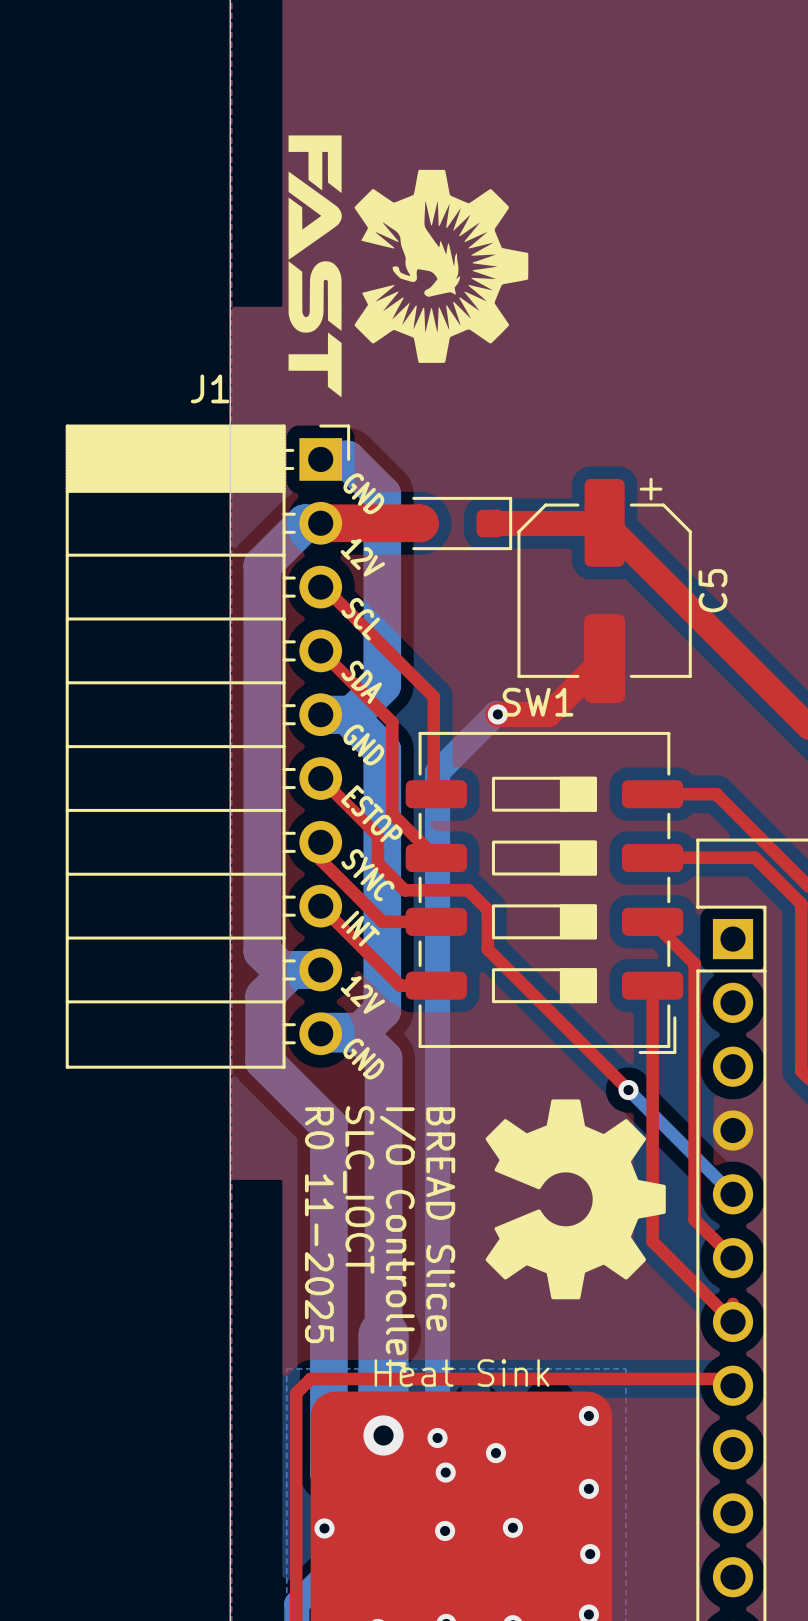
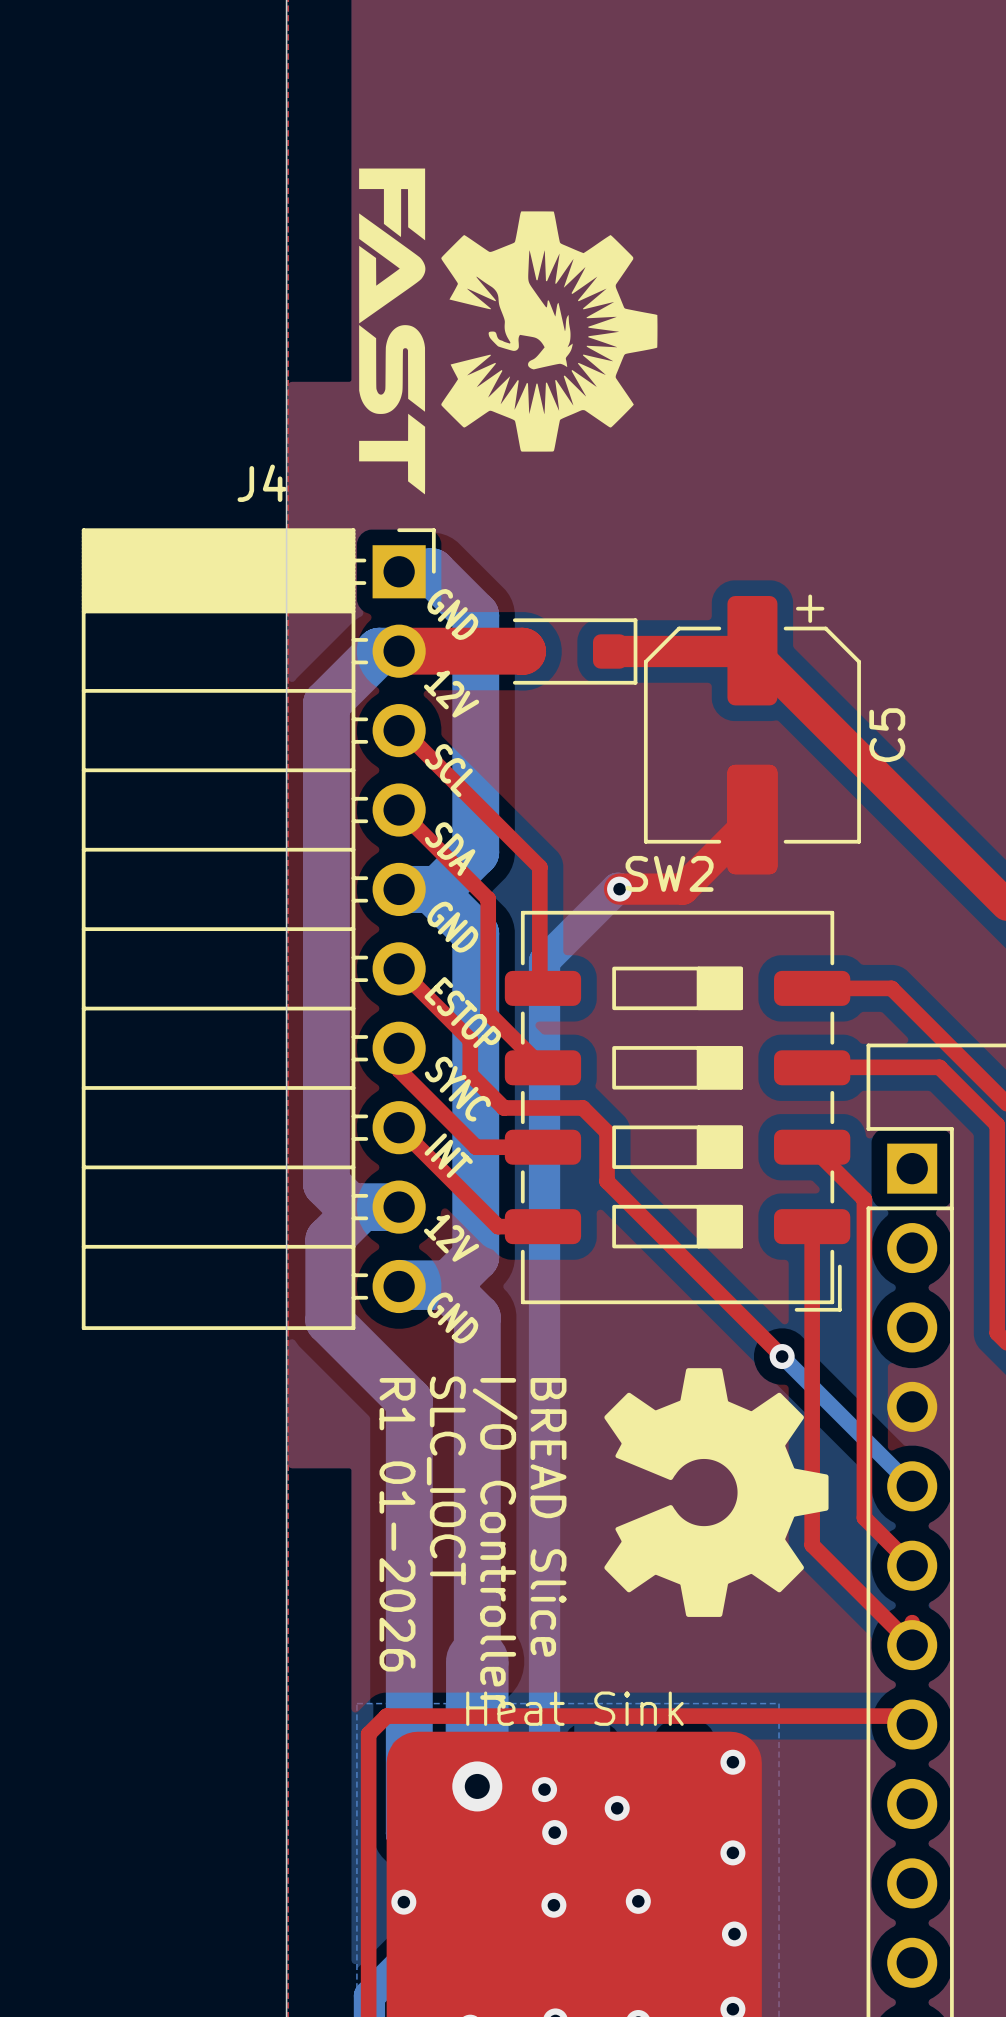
J1 name: J1 (210, 388) -> J4 (262, 483)
SW1 name: SW1 (538, 702) -> SW2 (669, 873)
text: R0 11-2025 (319, 1225) -> R1 01-2026 (397, 1524)

